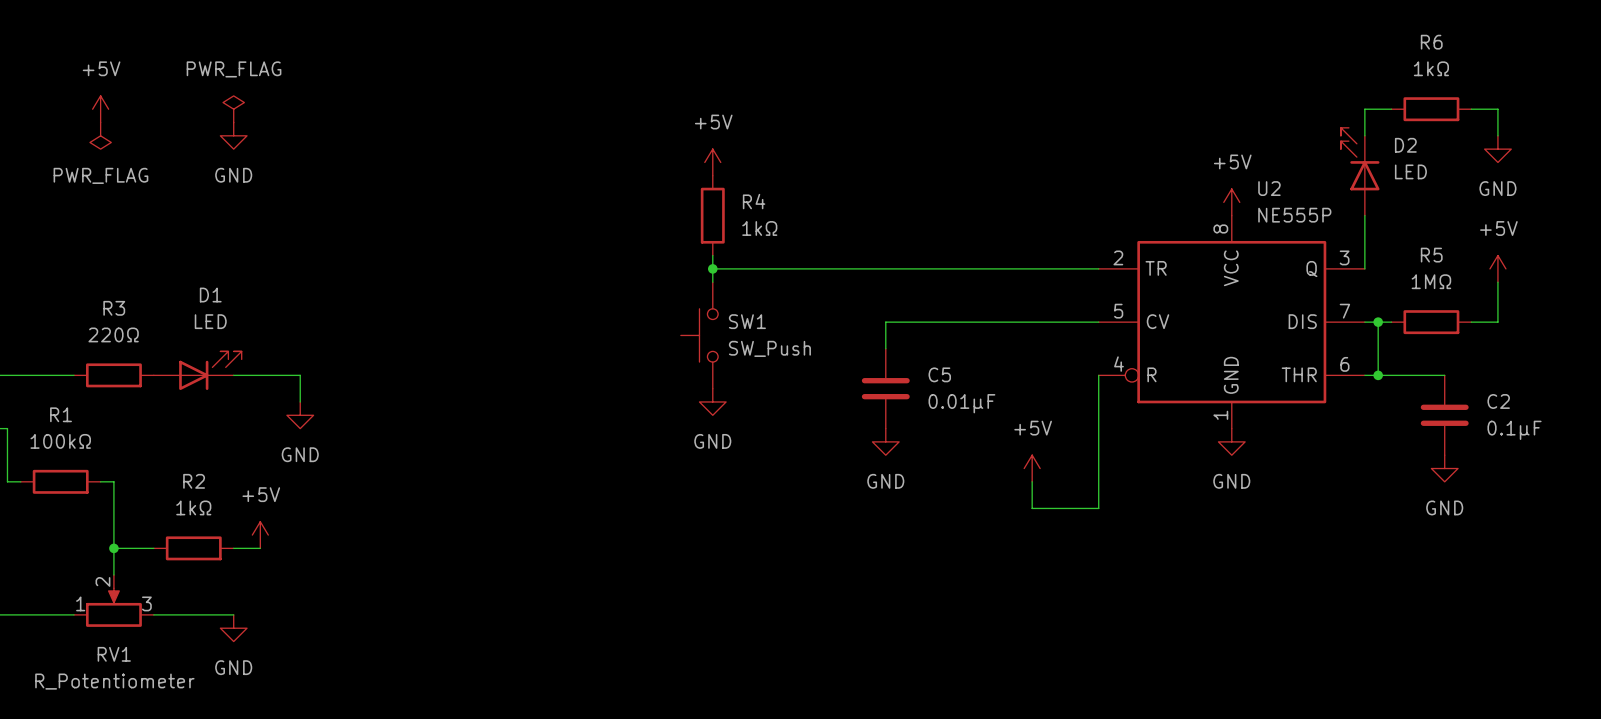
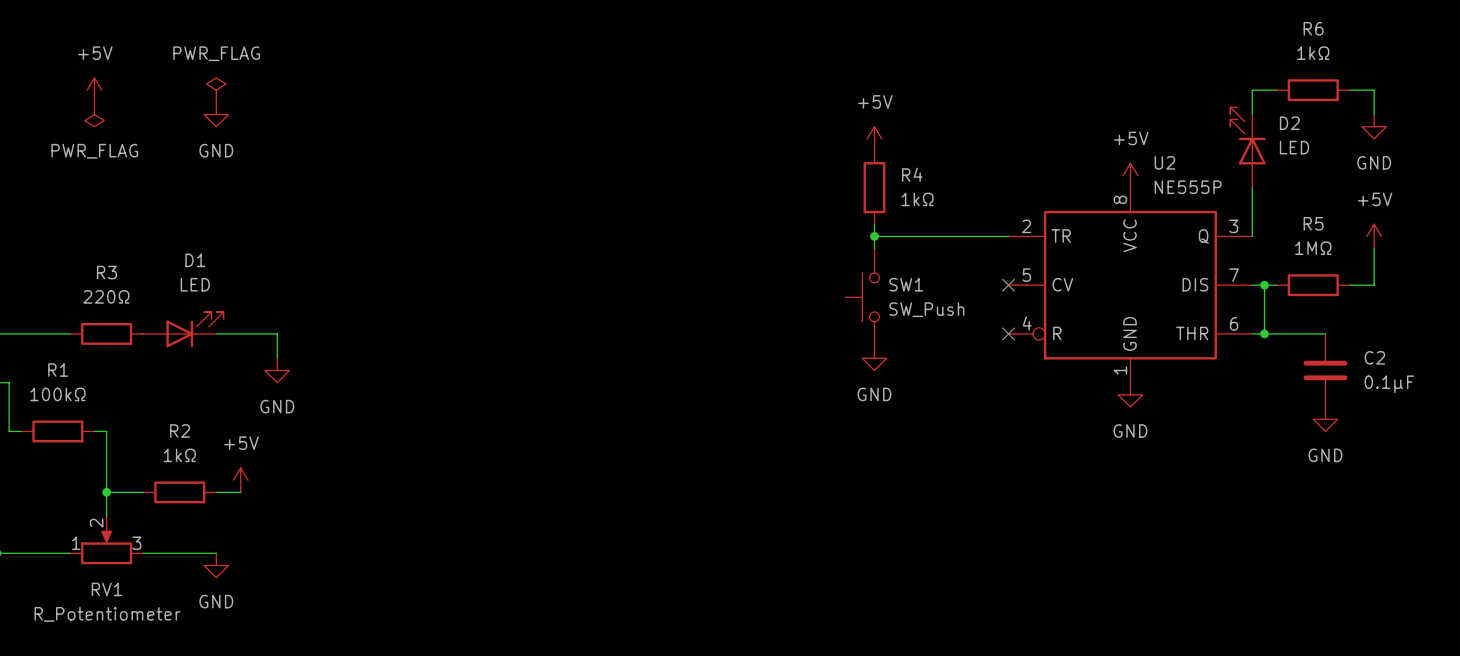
power symbol: +5V (712, 162) -> none
power symbol: none -> +5V (874, 138)
R4 position: (712, 215) -> (874, 187)
wire: (712, 255) (712, 282) -> (874, 224) (874, 248)
wire: (712, 268) (952, 268) -> none
junction: (712, 268) -> none
junction: none -> (874, 236)
wire: (1098, 322) (885, 322) (885, 348) -> none
no-connect mark: none -> (1008, 285)
SW1 position: (699, 335) -> (862, 297)
wire: (1098, 375) (1098, 508) (1032, 508) (1032, 481) -> none
no-connect mark: none -> (1008, 333)
C5: 0.01μF (885, 388) -> none
power symbol: GND (712, 401) -> none
power symbol position: GND (885, 441) -> GND (874, 358)
power symbol: +5V (1032, 468) -> none

